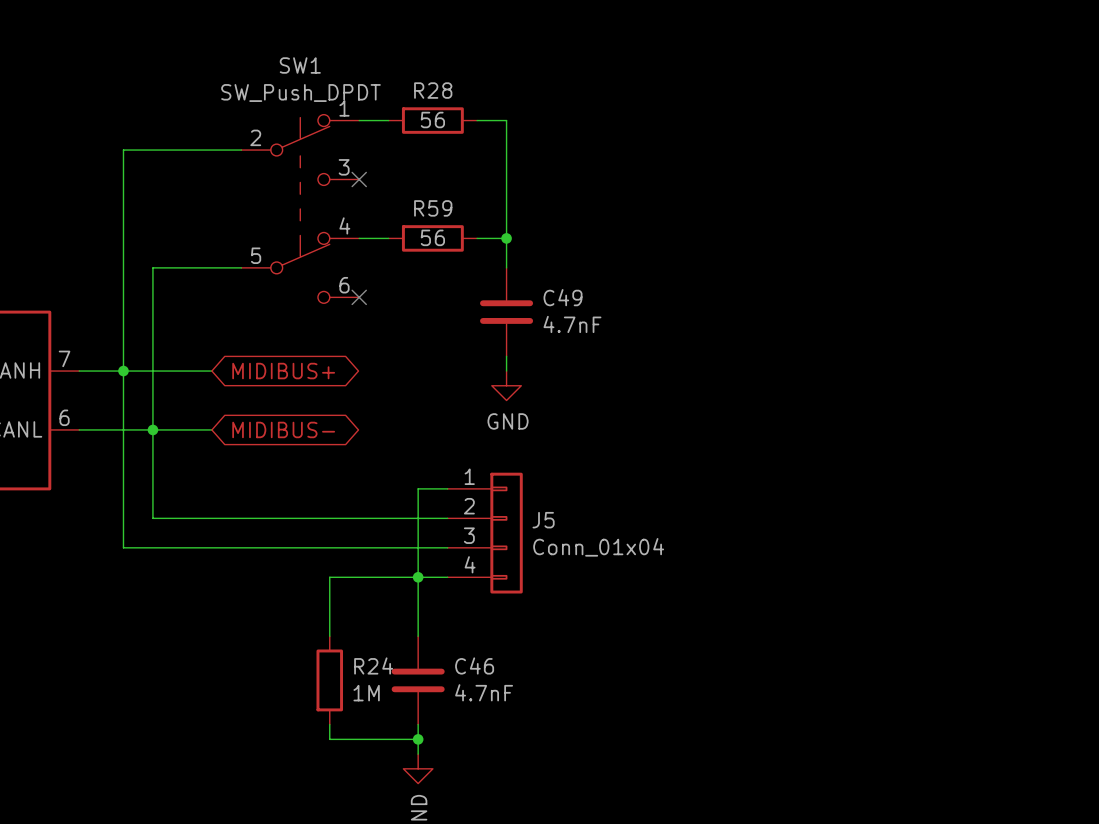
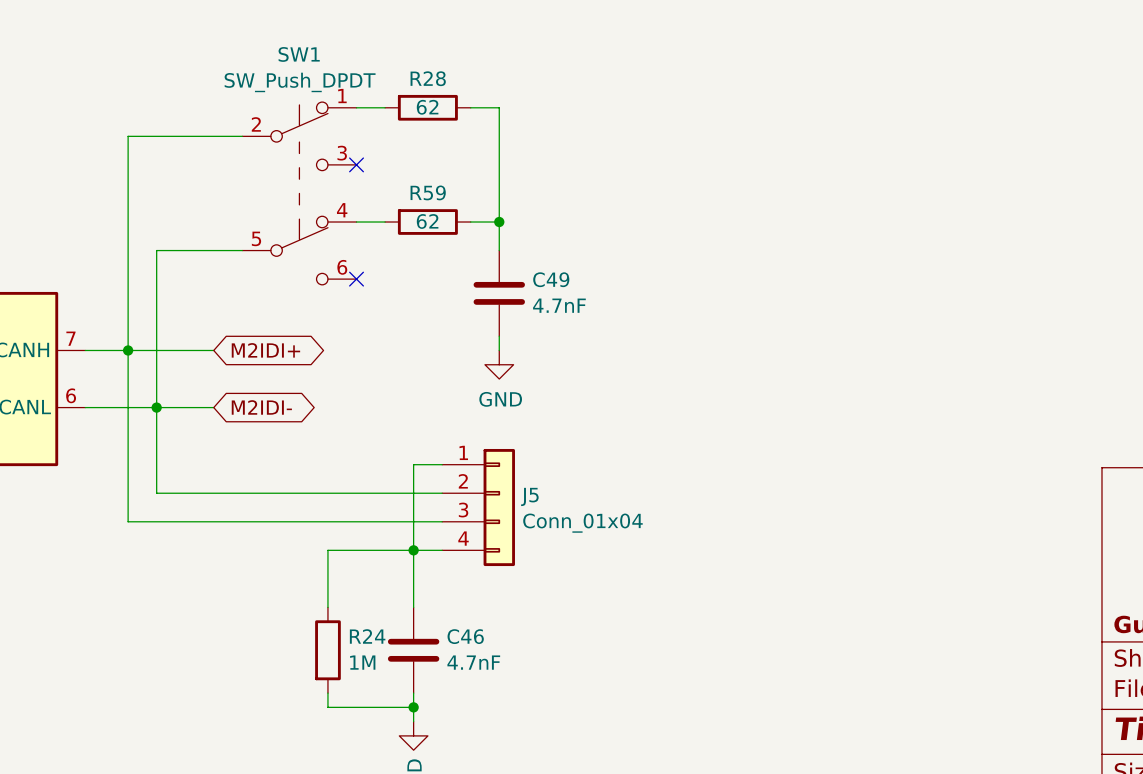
R28 value: 56 (432, 120) -> 62 (427, 107)
R59 value: 56 (432, 237) -> 62 (427, 221)
global label: MIDIBUS+ (283, 371) -> M2IDI+ (265, 350)
global label: MIDIBUS- (283, 429) -> M2IDI- (261, 407)

